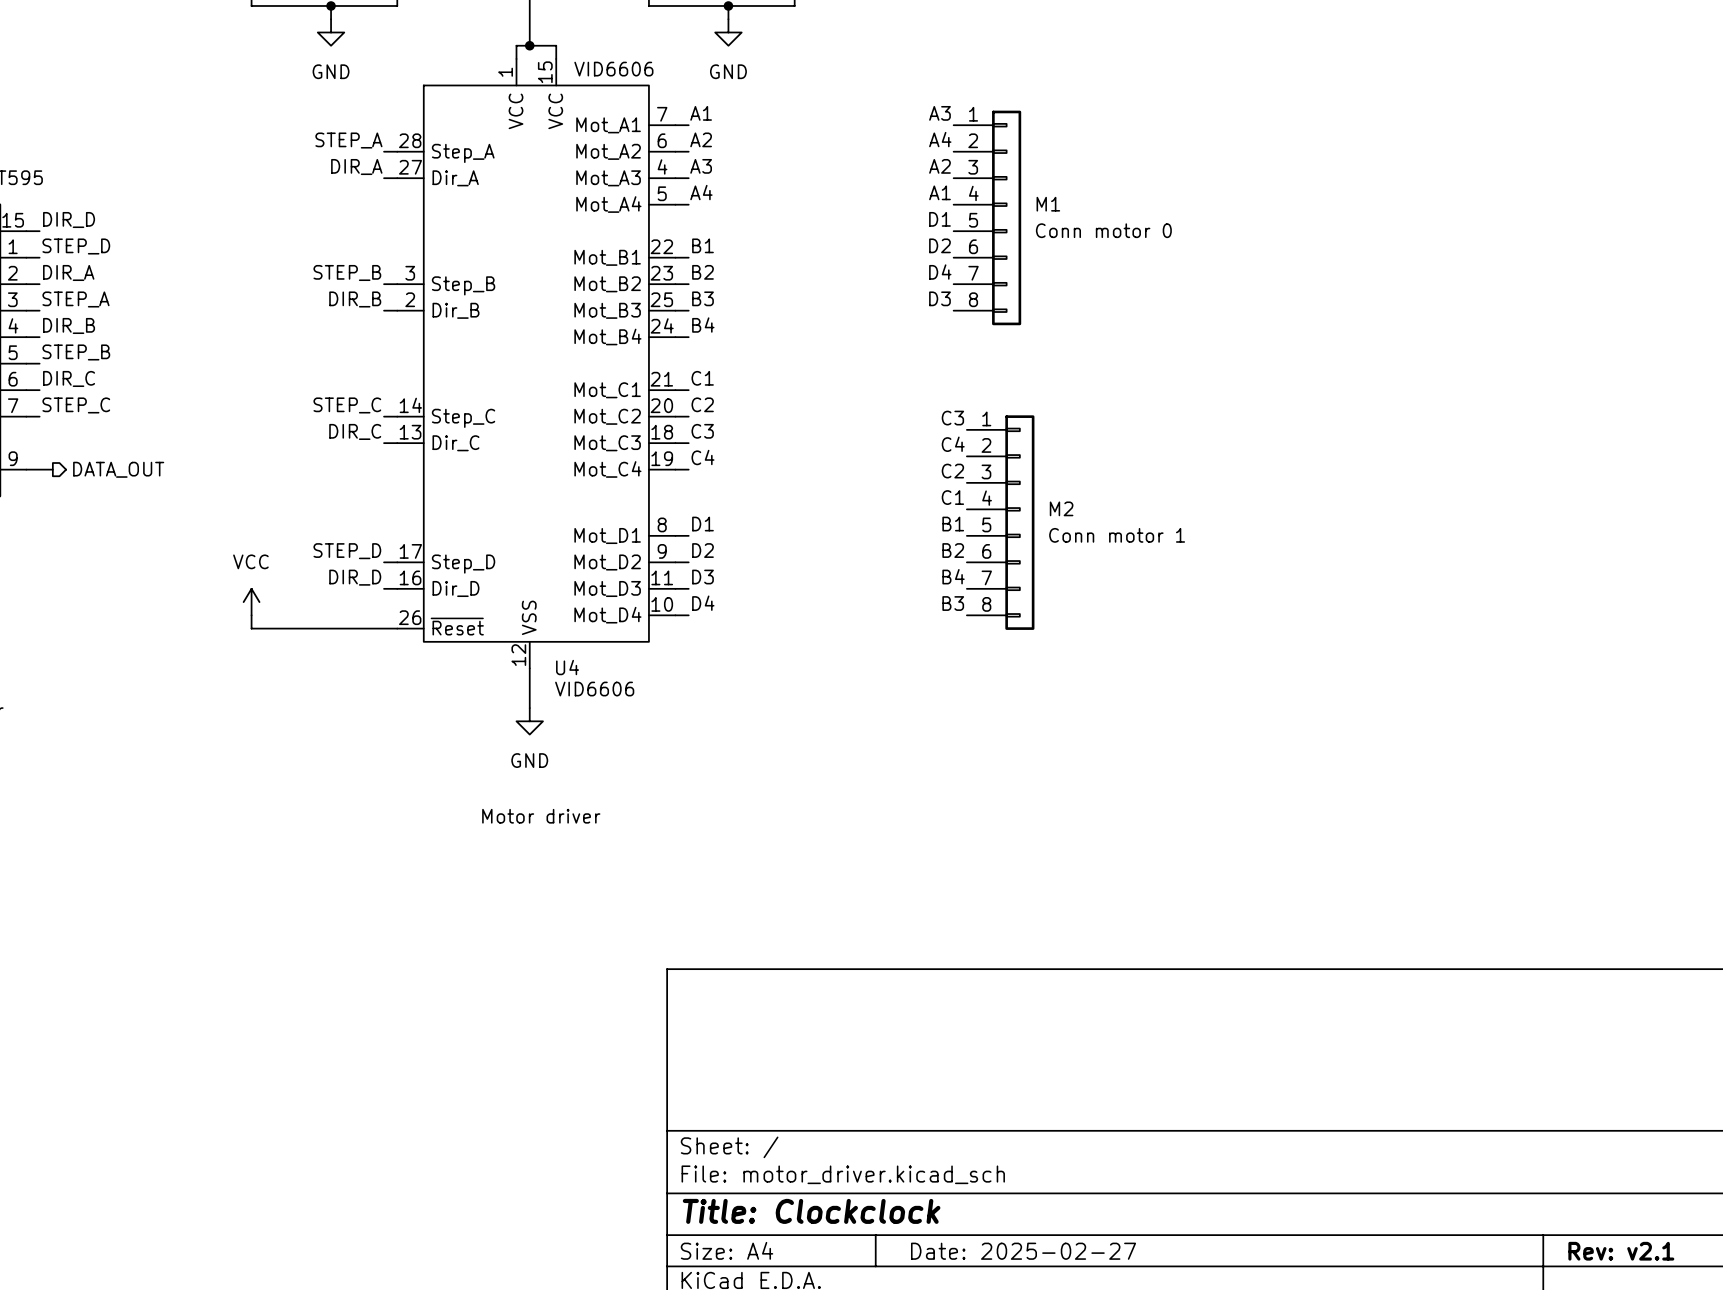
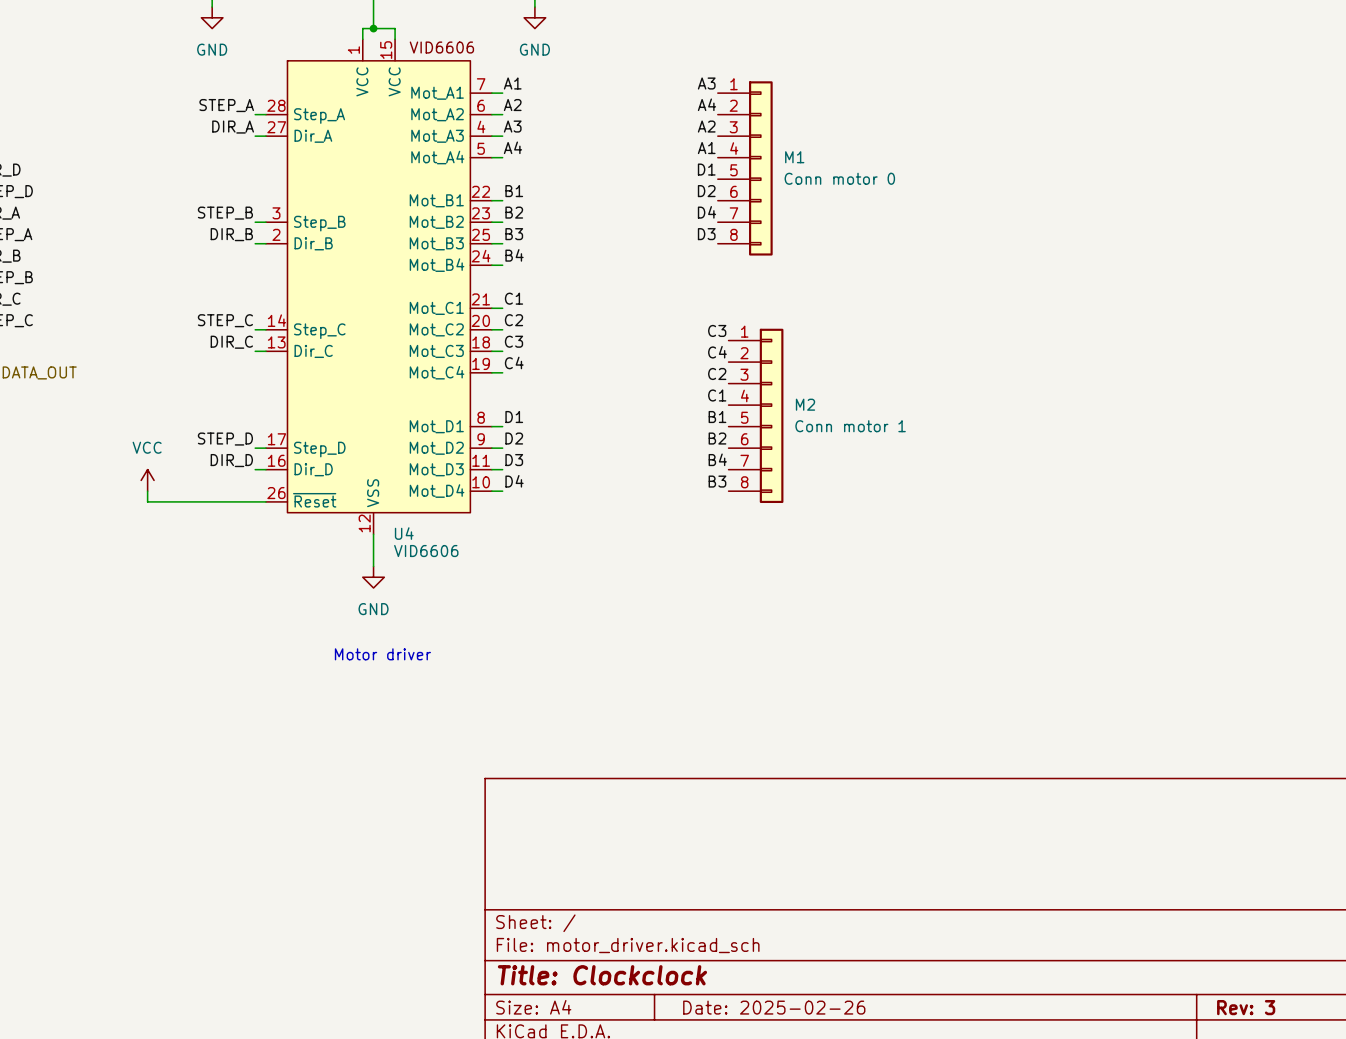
title block: Date: 2025-02-27 (1023, 1251) -> Date: 2025-02-26 (774, 1007)
title block: Rev: v2.1 (1621, 1251) -> Rev: 3 (1246, 1007)

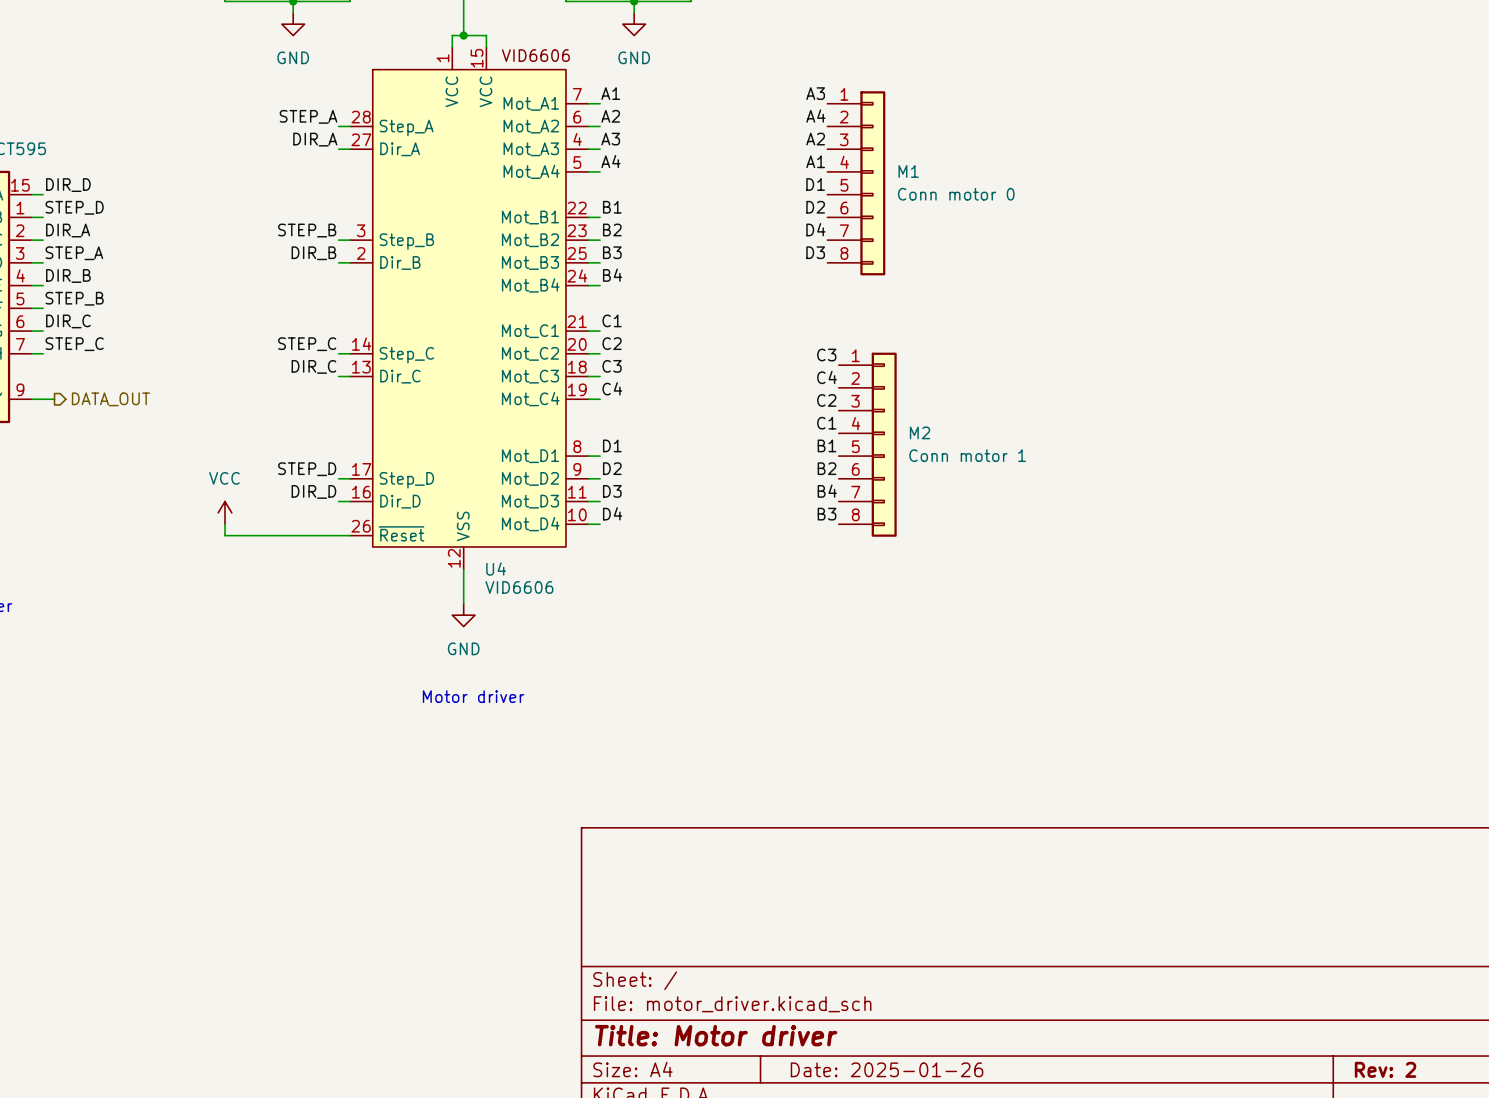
title block: Title: Clockclock (602, 975) -> Title: Motor driver (716, 1035)
title block: Date: 2025-02-26 (774, 1007) -> Date: 2025-01-26 (887, 1069)
title block: Rev: 3 (1246, 1007) -> Rev: 2 (1385, 1069)

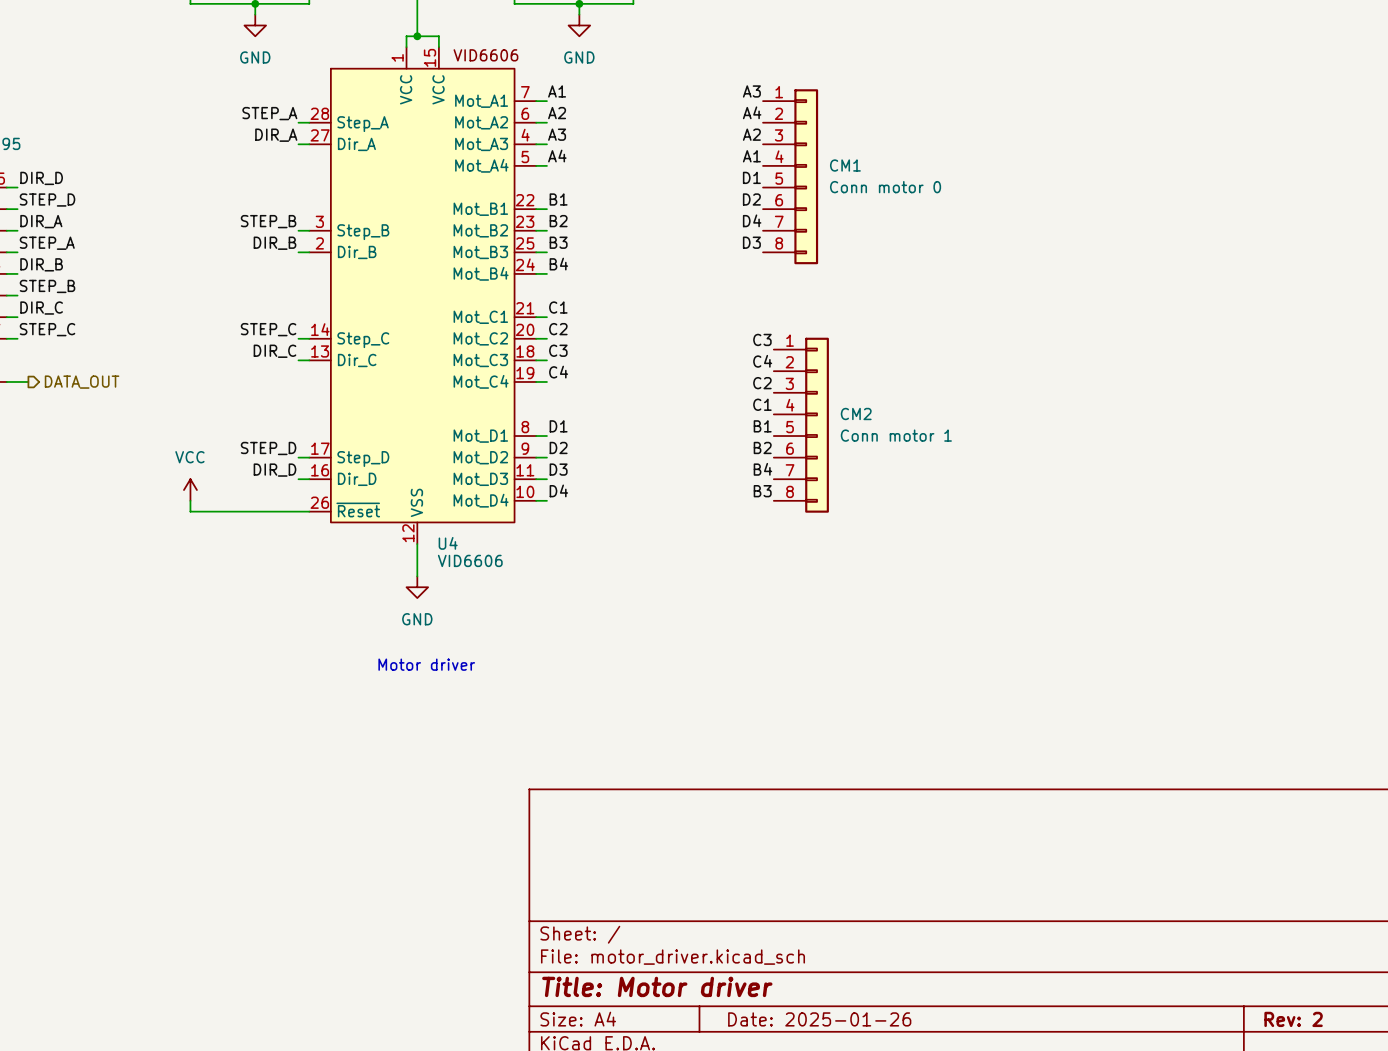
M1 name: M1 (908, 171) -> CM1 (845, 165)
M2 name: M2 (920, 432) -> CM2 (856, 414)

